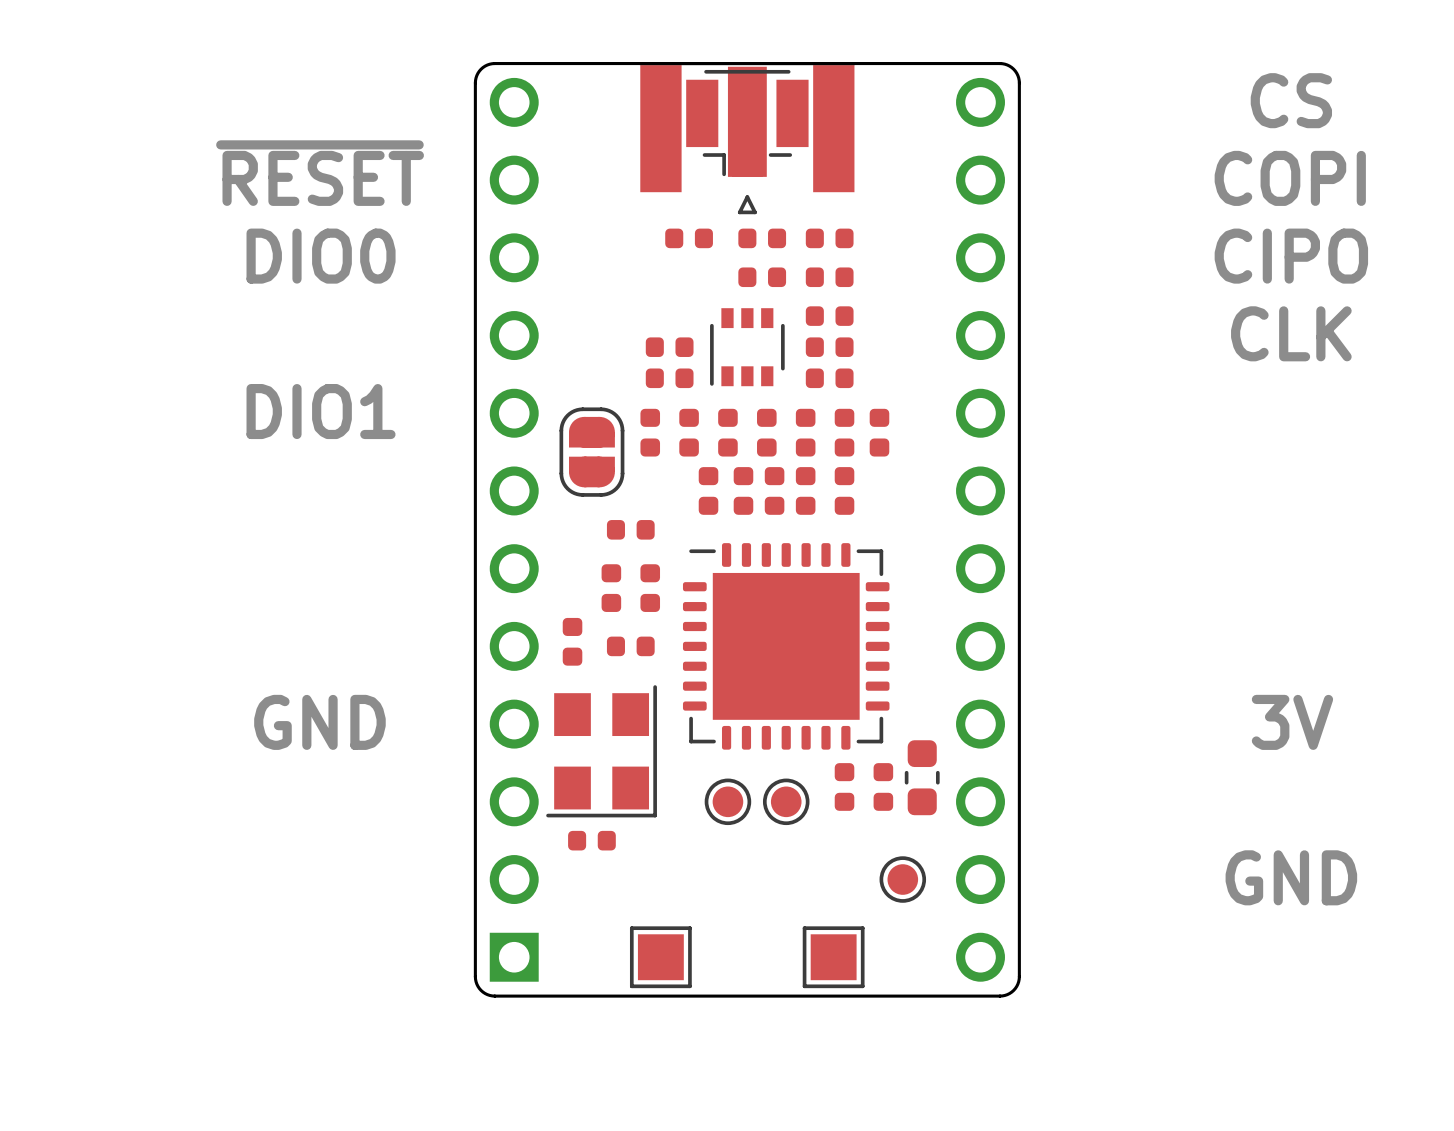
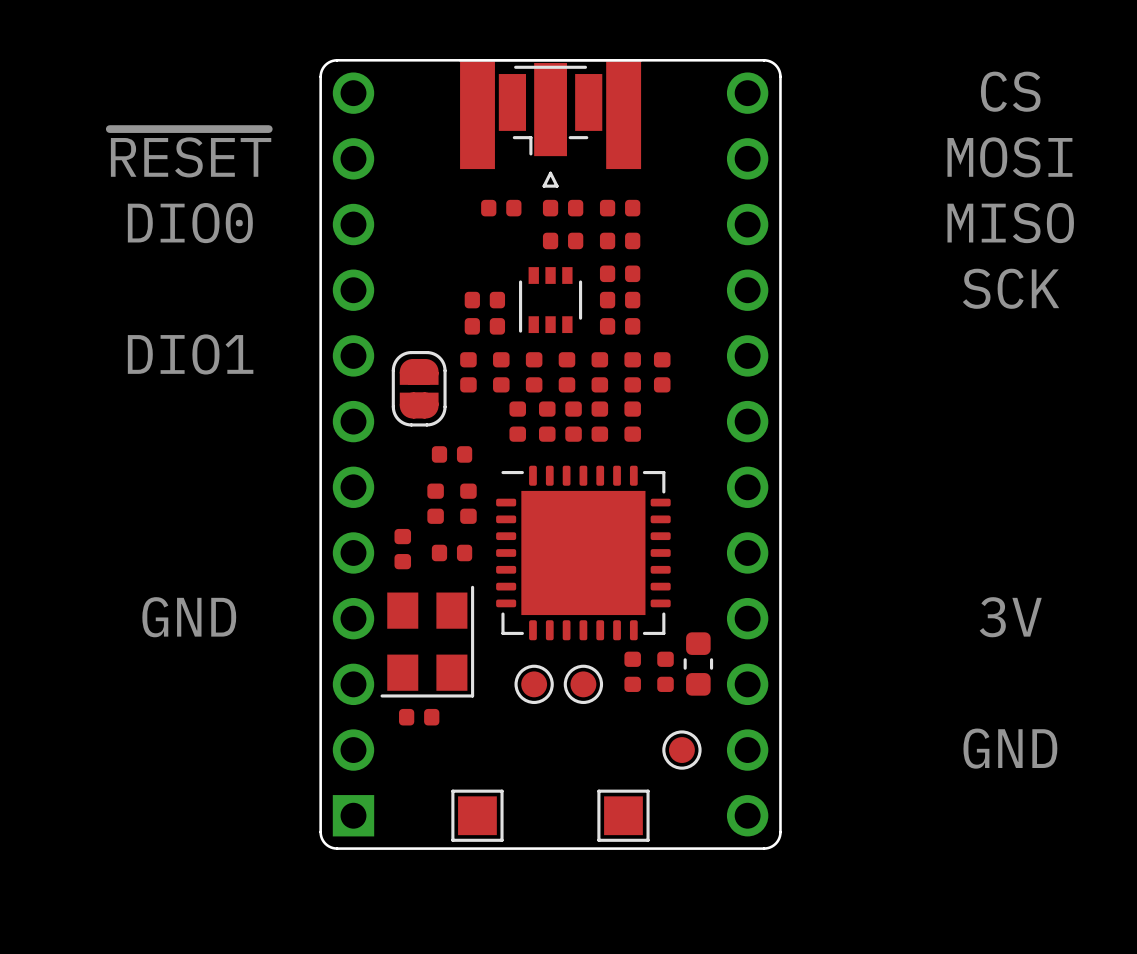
text: COPI (1290, 178) -> MOSI (1009, 157)
text: CIPO (1291, 256) -> MISO (1010, 223)
text: CLK (1291, 333) -> SCK (1011, 288)

